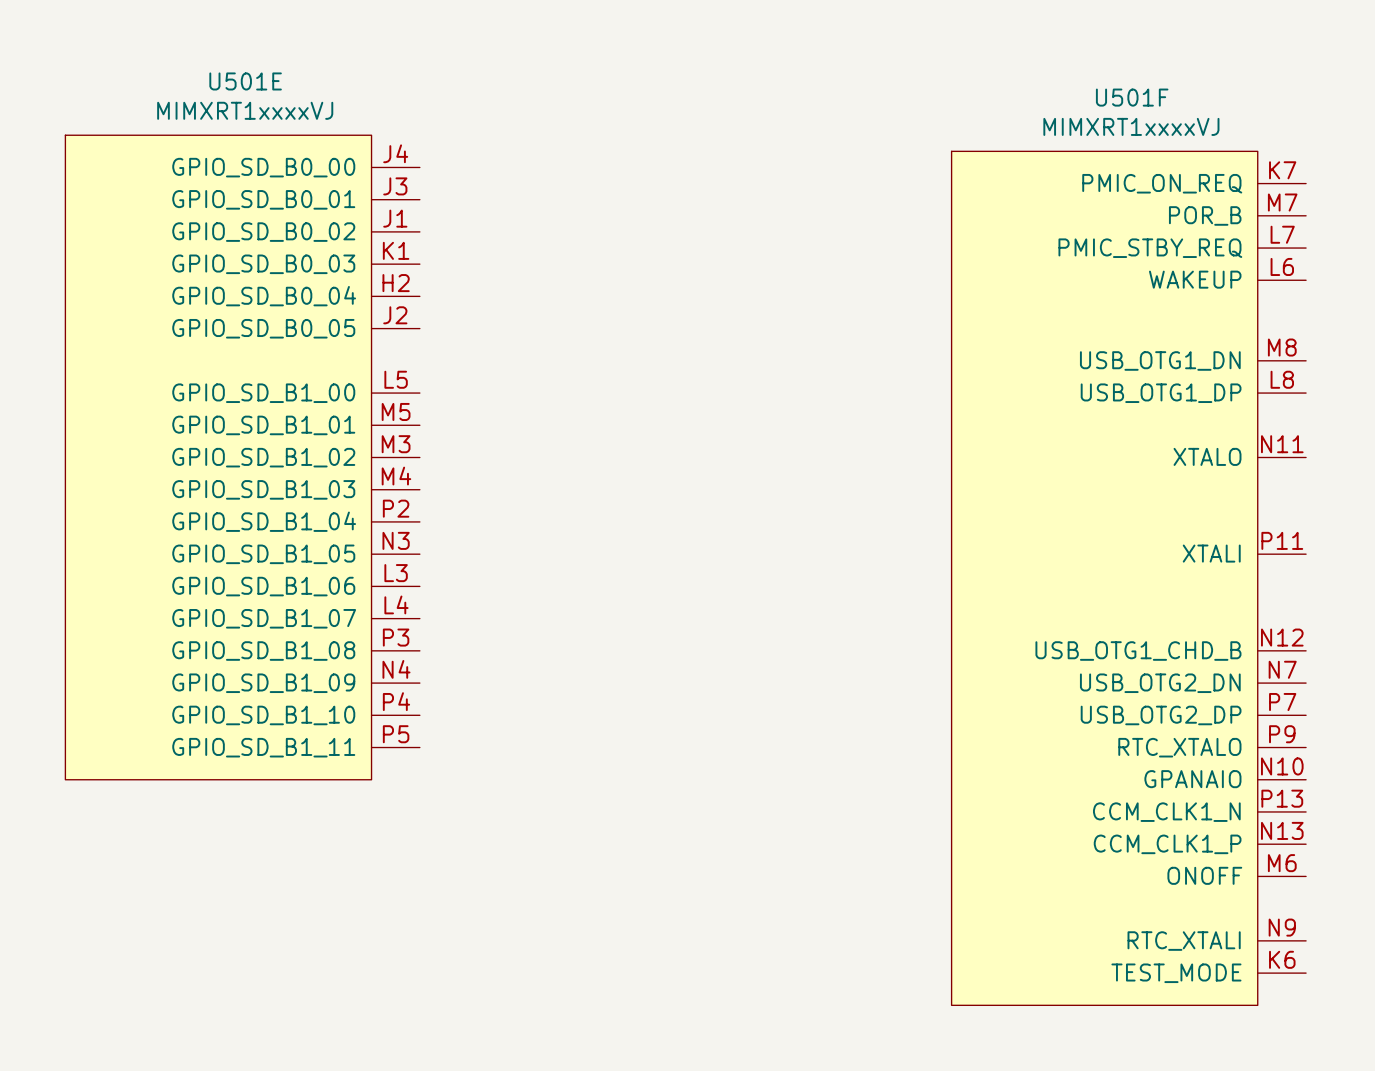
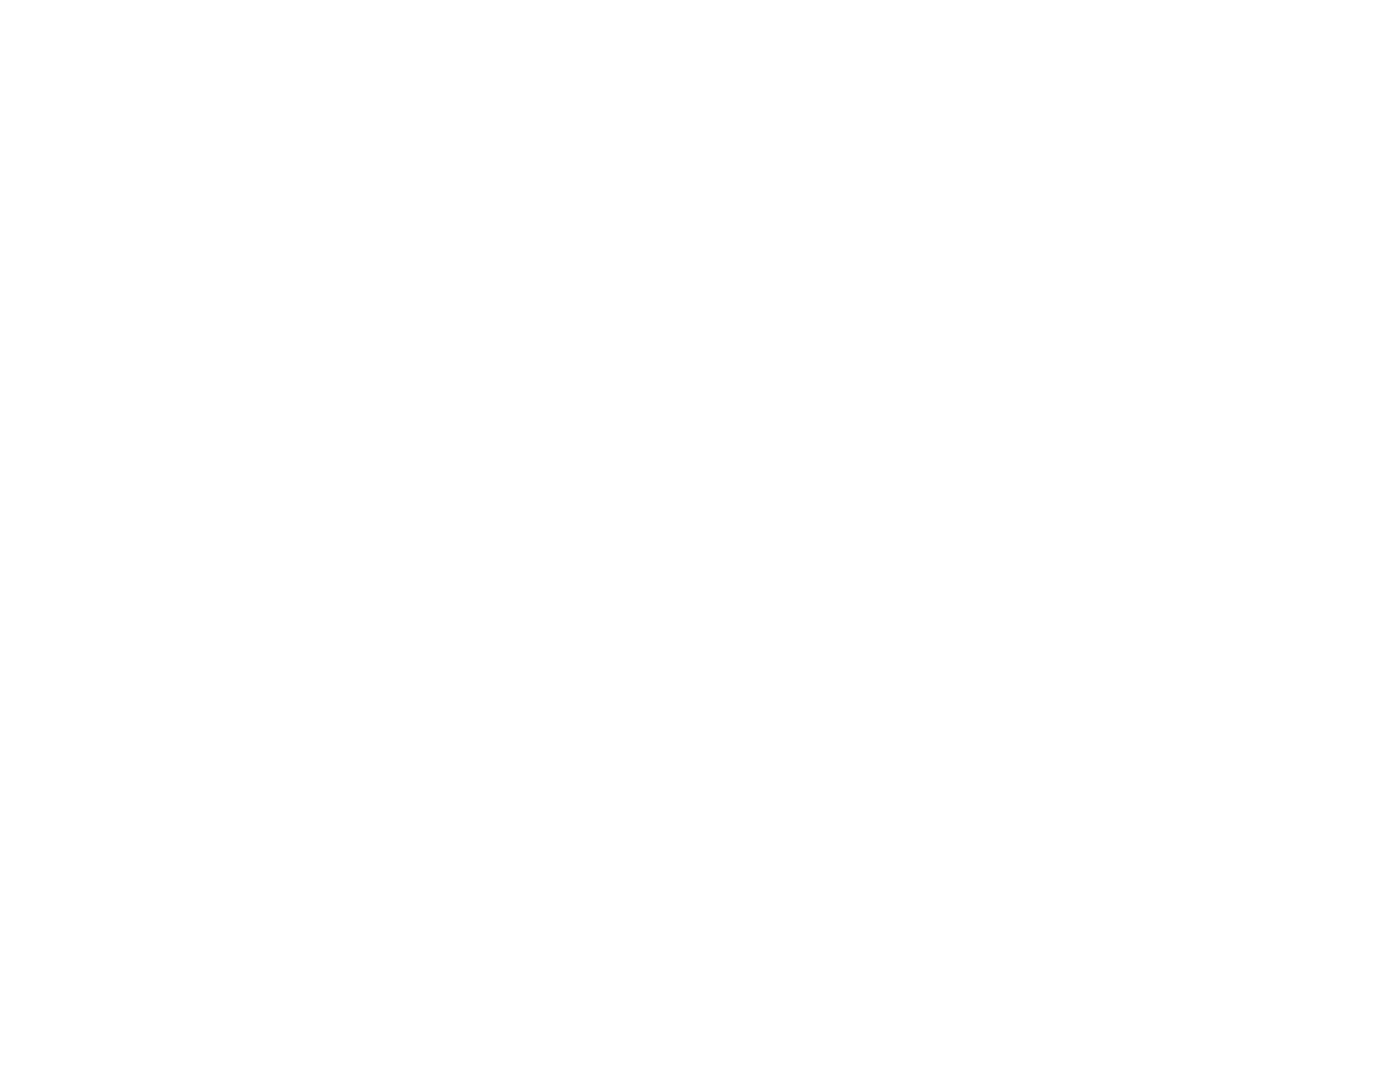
U501E: MIMXRT1xxxxVJ (242, 457) -> none
U501F: MIMXRT1xxxxVJ (1128, 578) -> none

